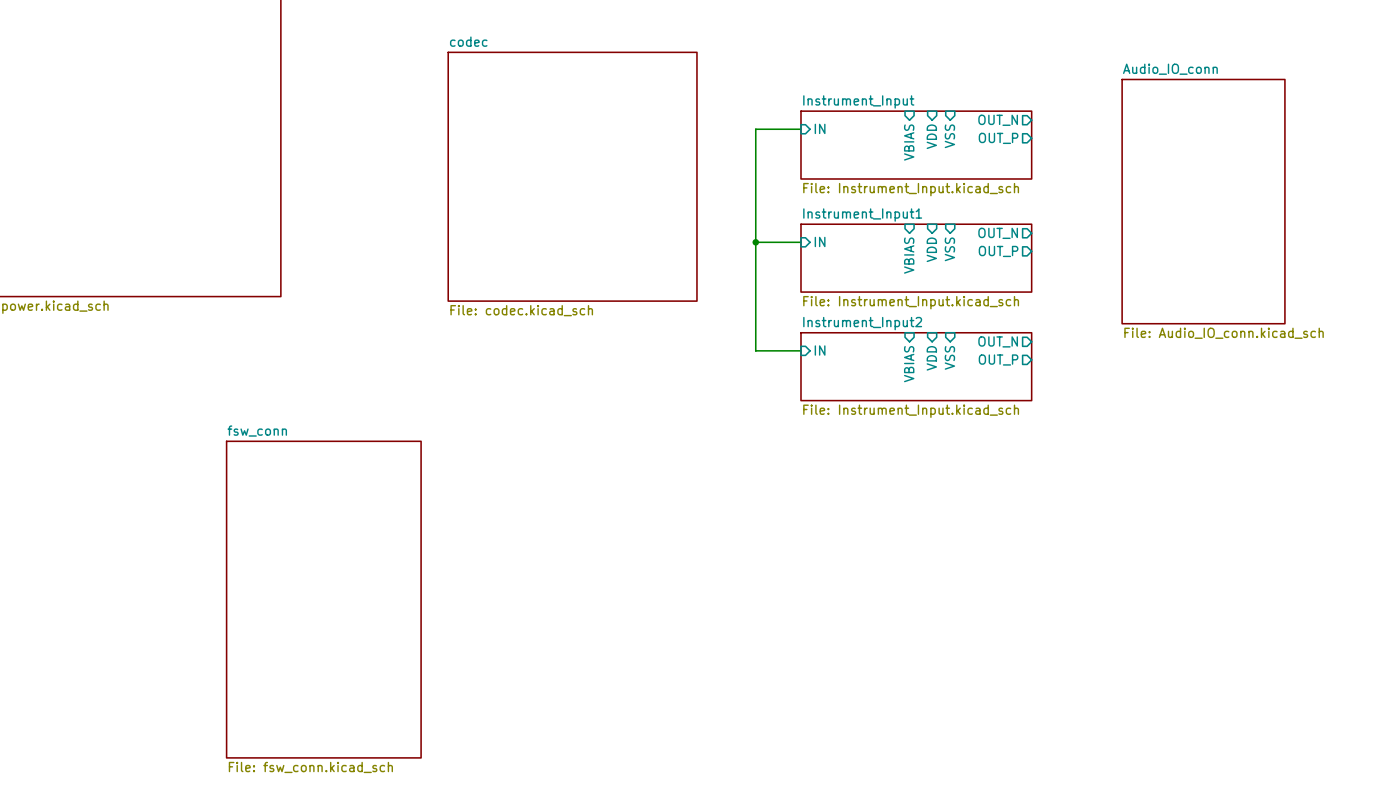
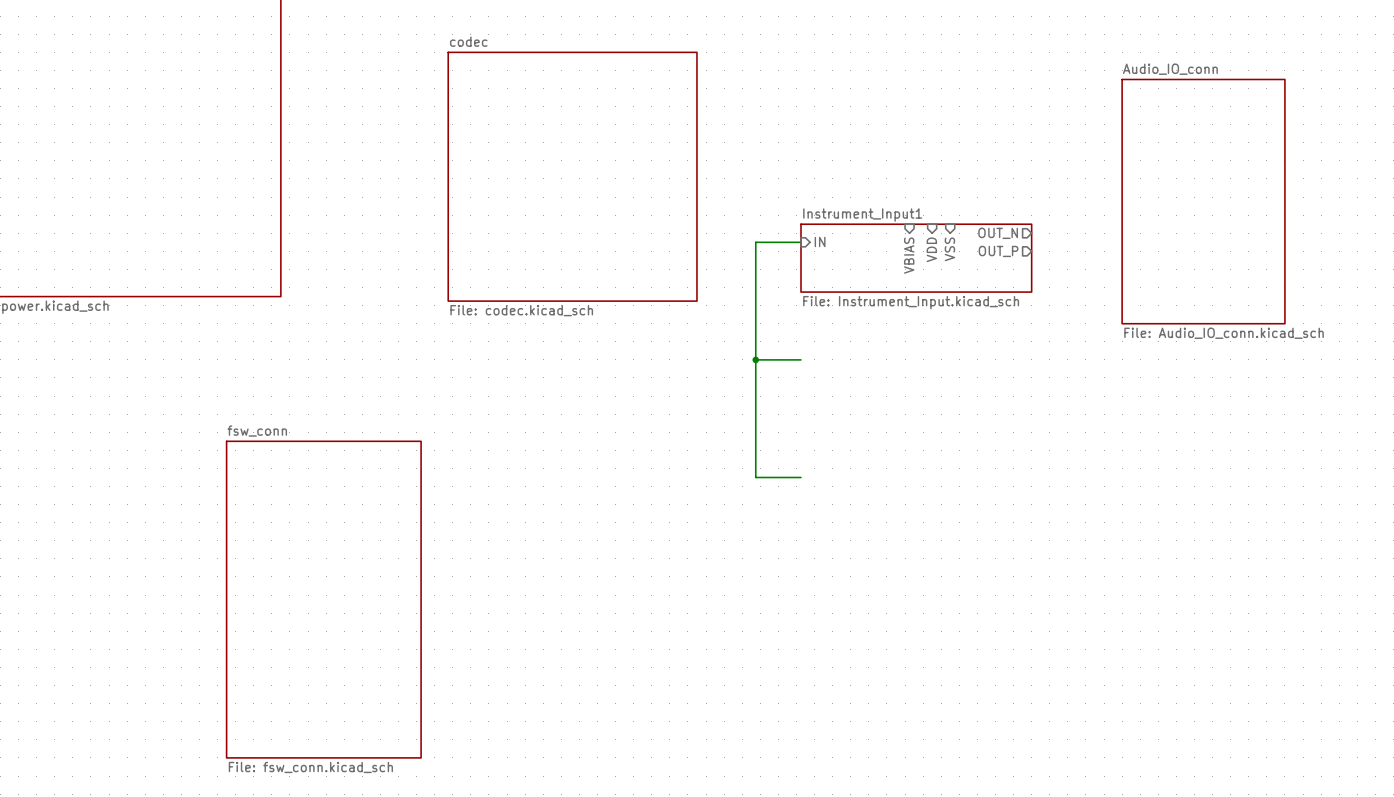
sheet pin: OUT_N (998, 120) -> none
sheet pin: IN (820, 128) -> none
wire: (800, 129) (755, 129) (755, 242) -> none
sheet pin: VDD (931, 136) -> none
sheet pin: VSS (949, 136) -> none
sheet pin: OUT_P (998, 138) -> none
sheet pin: VBIAS (909, 142) -> none
sheet Instrument_Input: File: Instrument_Input.kicad_sch (916, 145) -> none
junction: (755, 242) -> none
sheet pin: OUT_N (998, 341) -> none
wire: (755, 350) (800, 350) -> (755, 350) (755, 477) (800, 477)
sheet pin: IN (820, 350) -> none
sheet pin: VSS (949, 357) -> none
sheet pin: VDD (931, 358) -> none
wire: none -> (755, 359) (800, 359)
junction: none -> (755, 359)
sheet pin: OUT_P (998, 359) -> none
sheet pin: VBIAS (909, 364) -> none
sheet Instrument_Input2: File: Instrument_Input.kicad_sch (916, 366) -> none

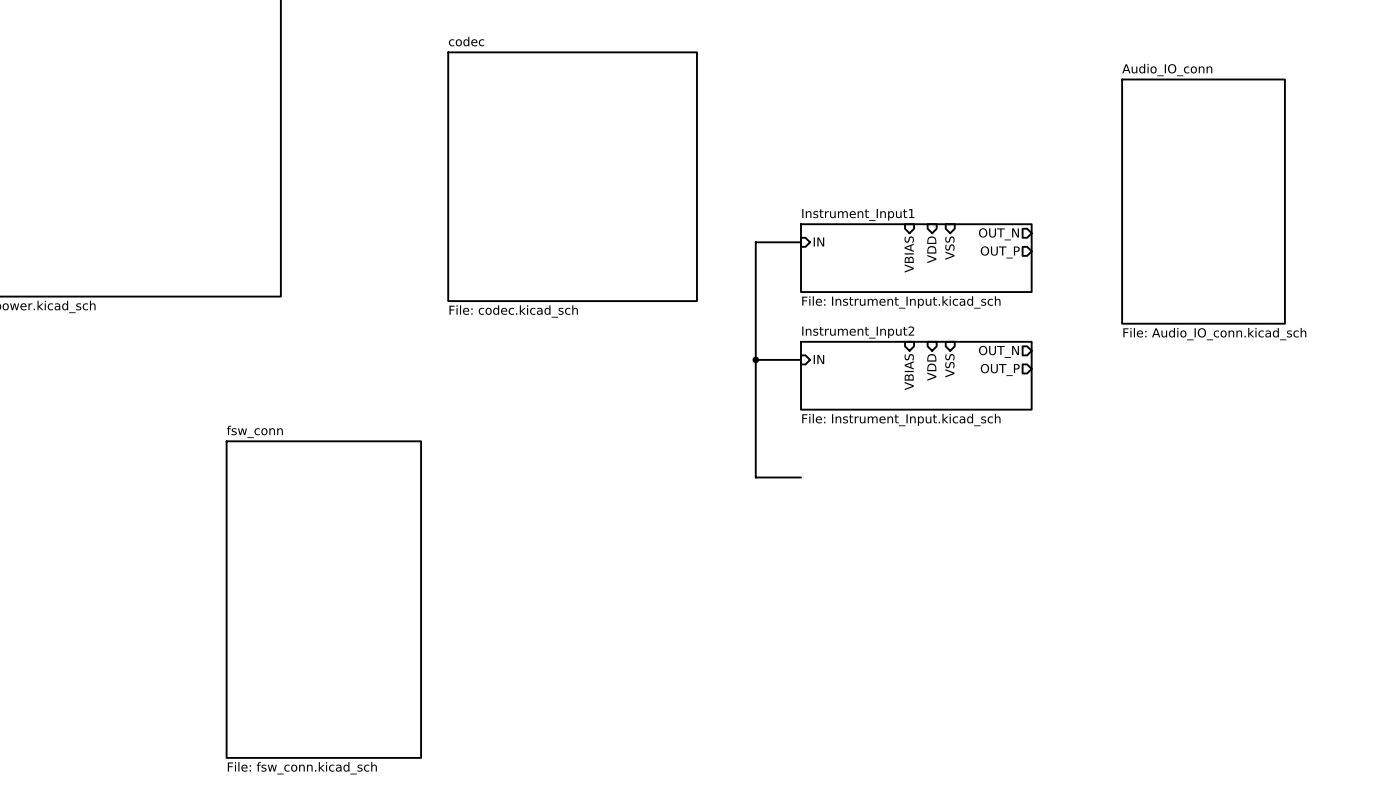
sheet pin: none -> OUT_N (998, 351)
sheet pin: none -> IN (818, 359)
sheet pin: none -> VSS (949, 365)
sheet pin: none -> VDD (931, 367)
sheet pin: none -> OUT_P (1000, 369)
sheet pin: none -> VBIAS (909, 372)
sheet Instrument_Input2: none -> File: Instrument_Input.kicad_sch (916, 375)

